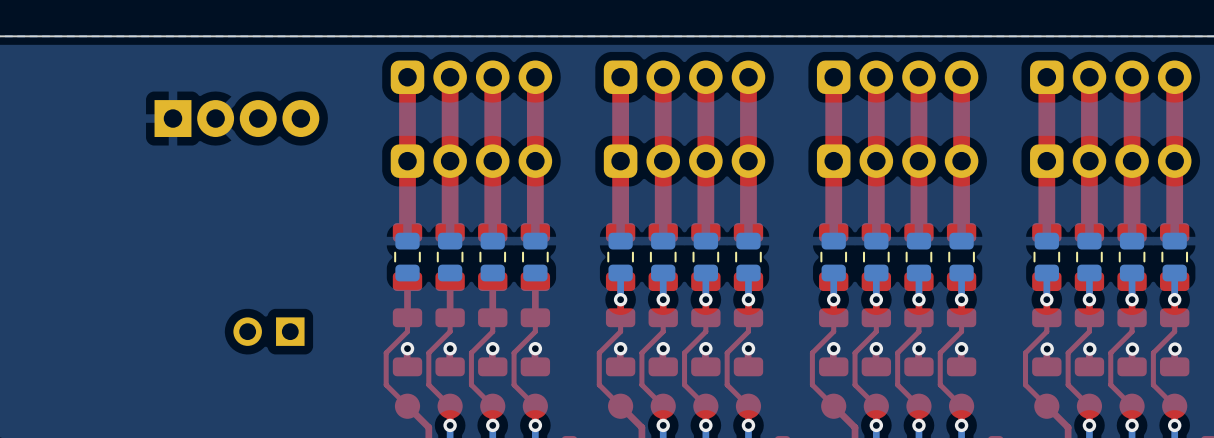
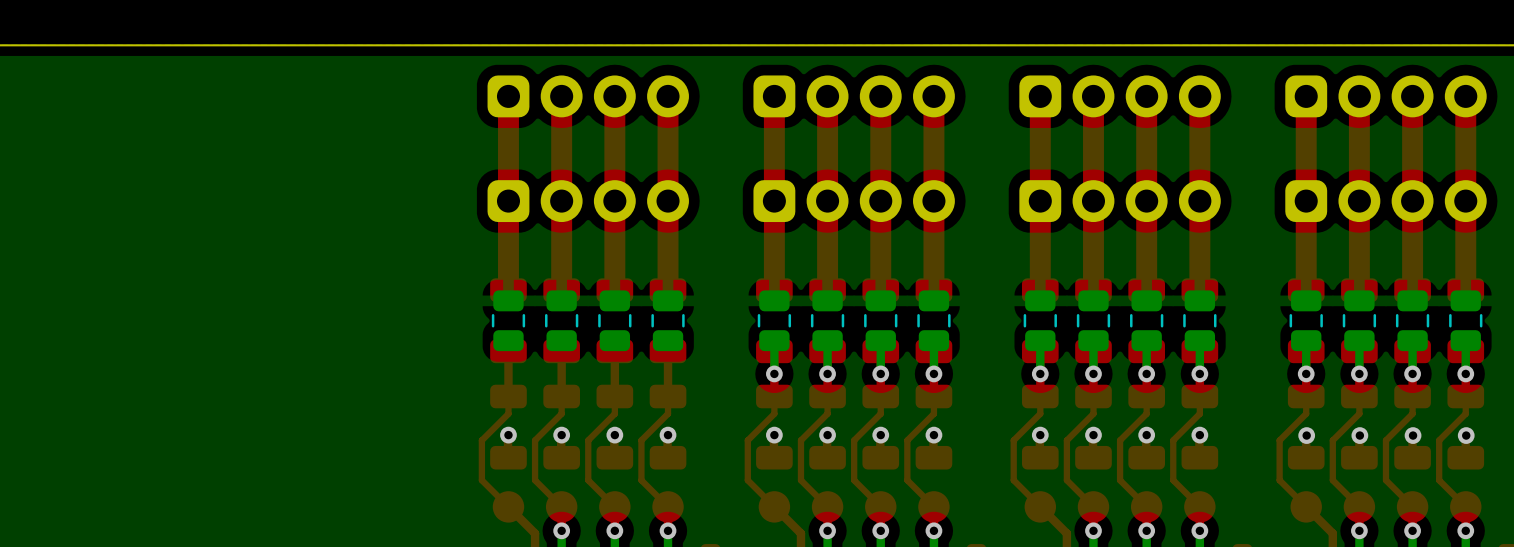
part: (236, 118) -> none
part: (268, 331) -> none

